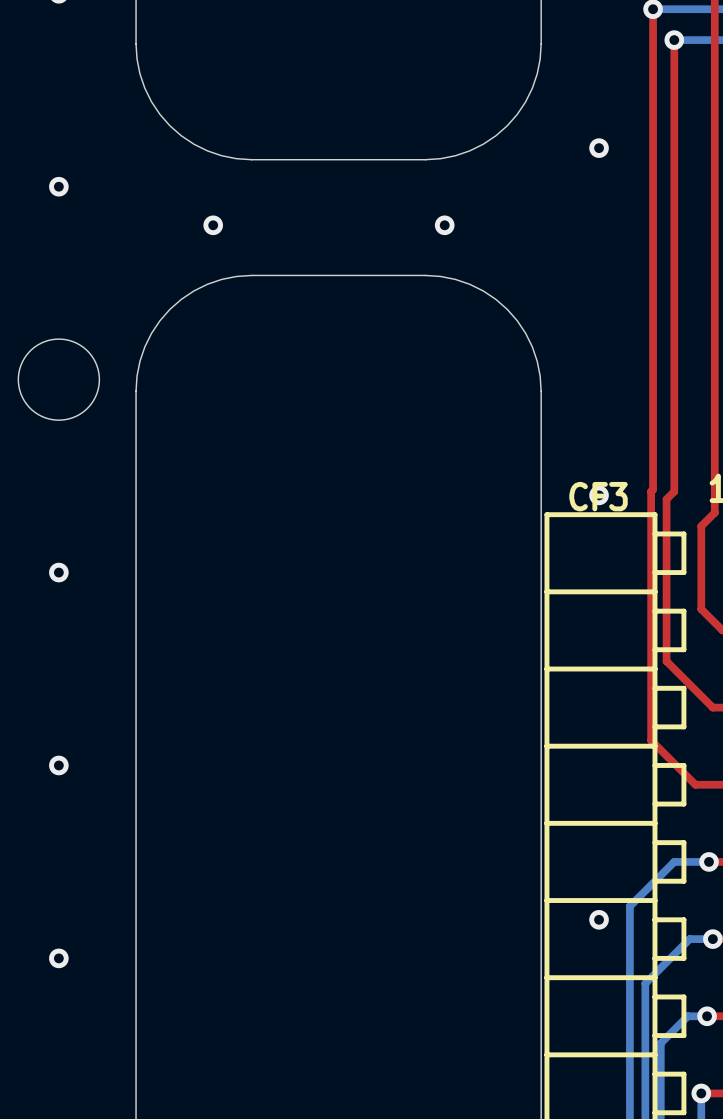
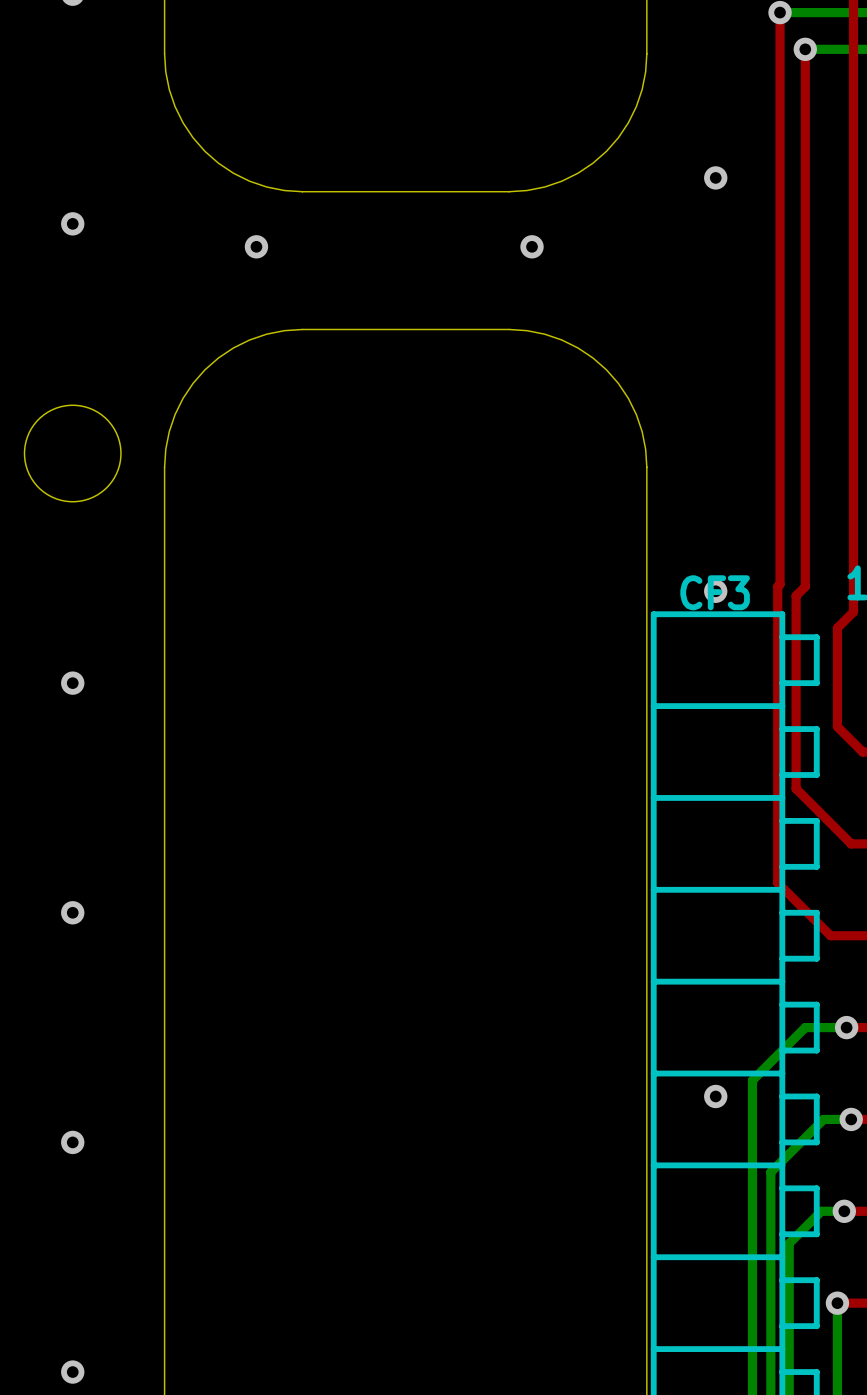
via position: (213, 225) -> (256, 246)
via position: (444, 225) -> (532, 246)

